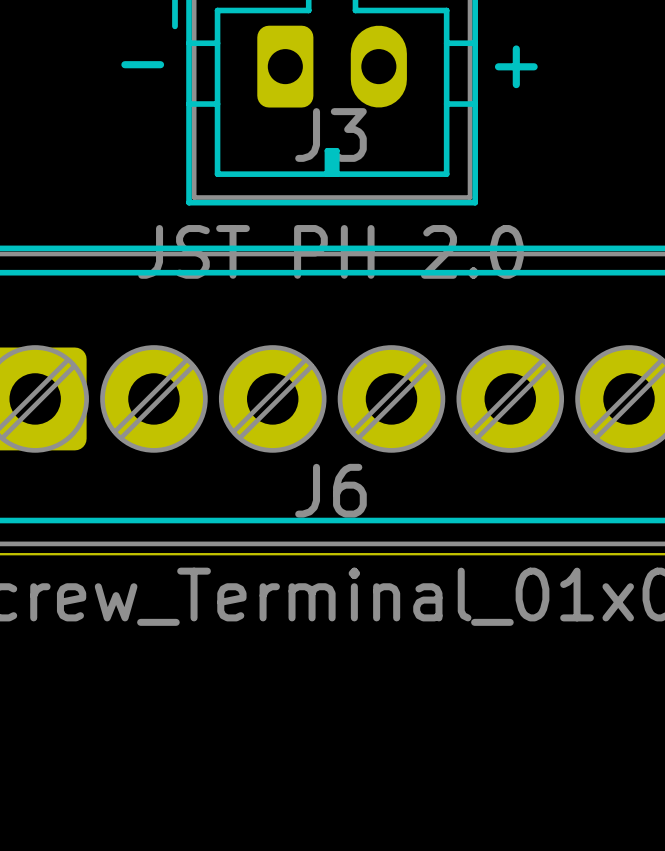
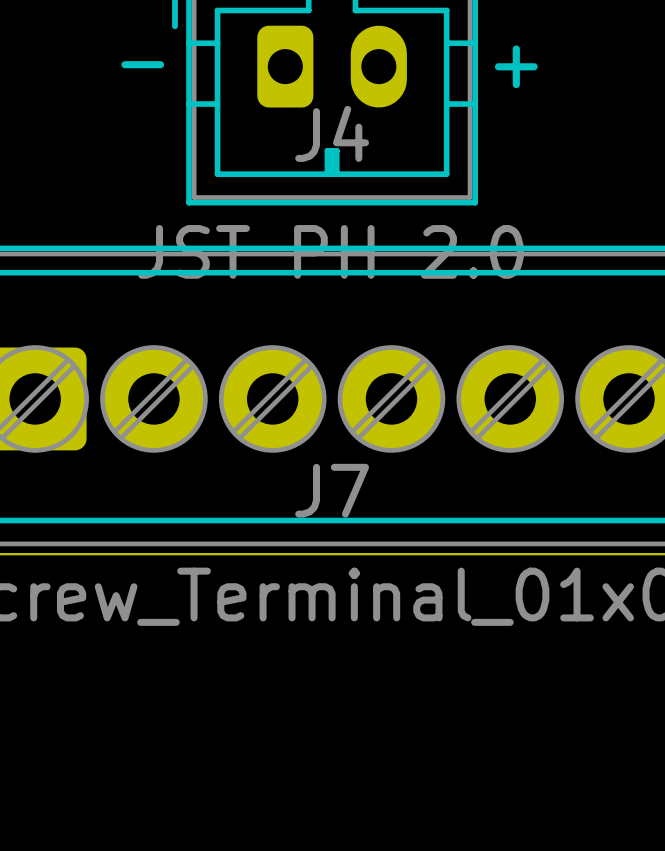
J3 name: J3 (330, 135) -> J4 (332, 133)
J6 name: J6 (330, 490) -> J7 (332, 490)

